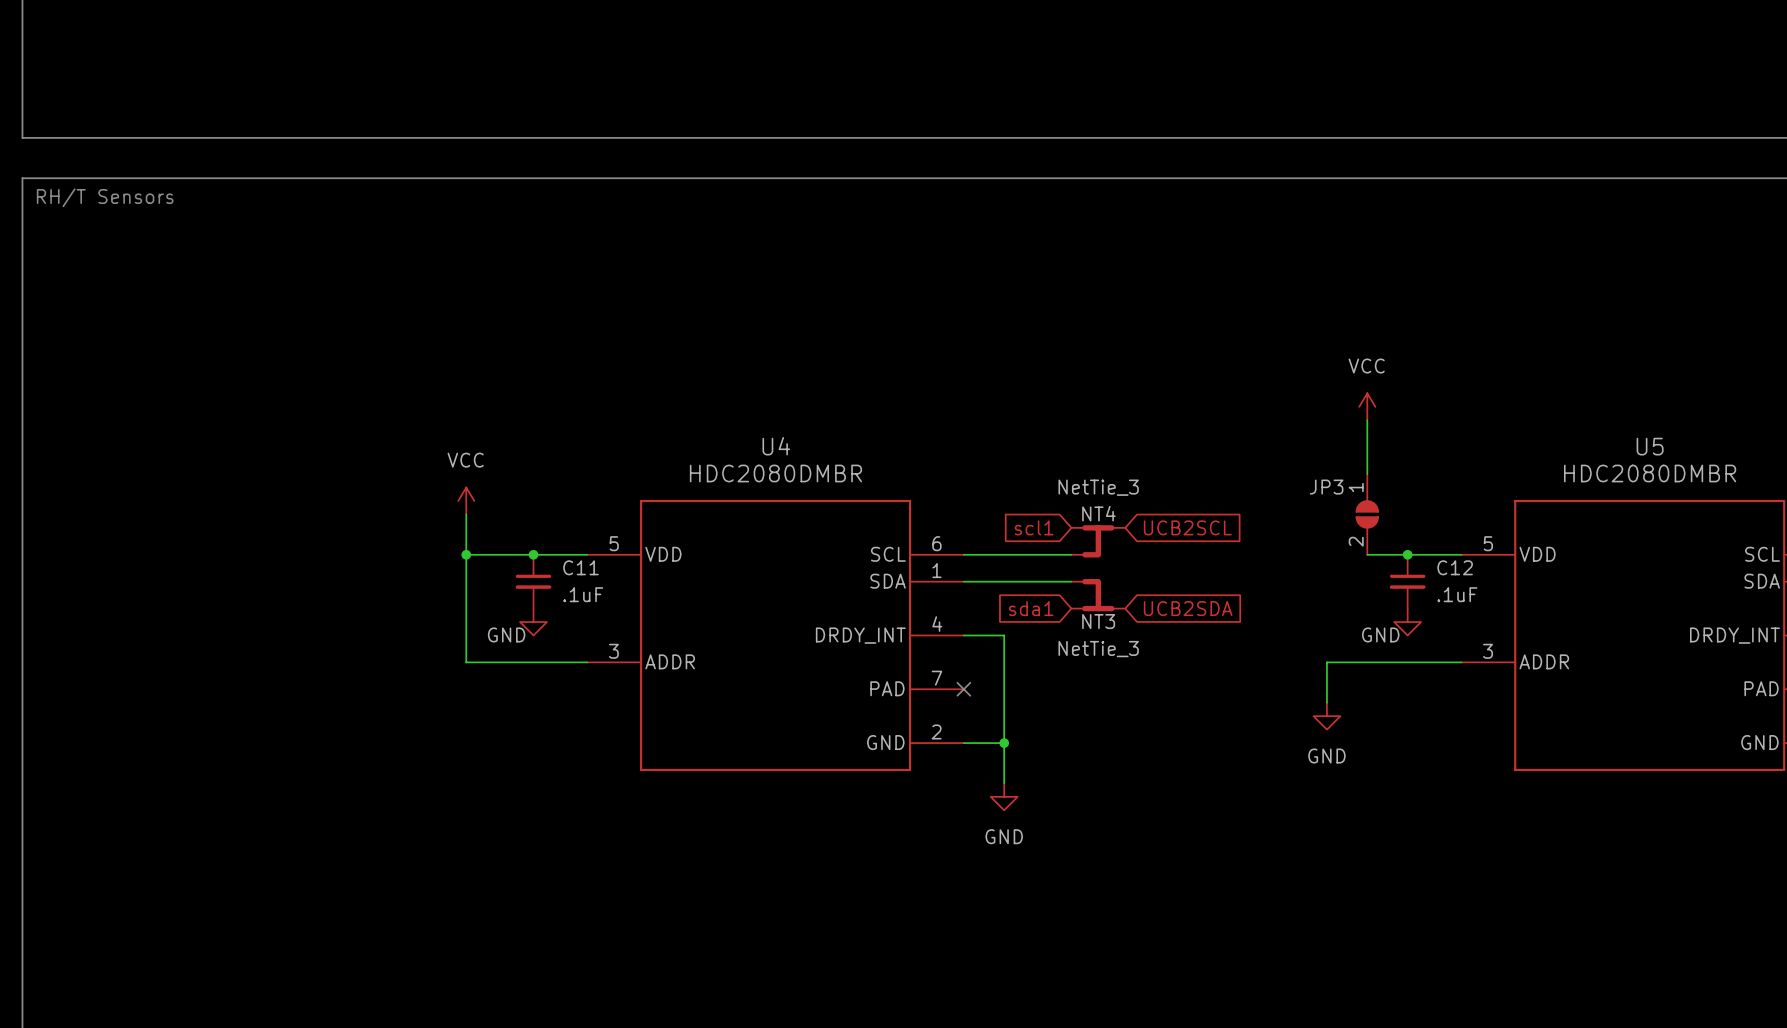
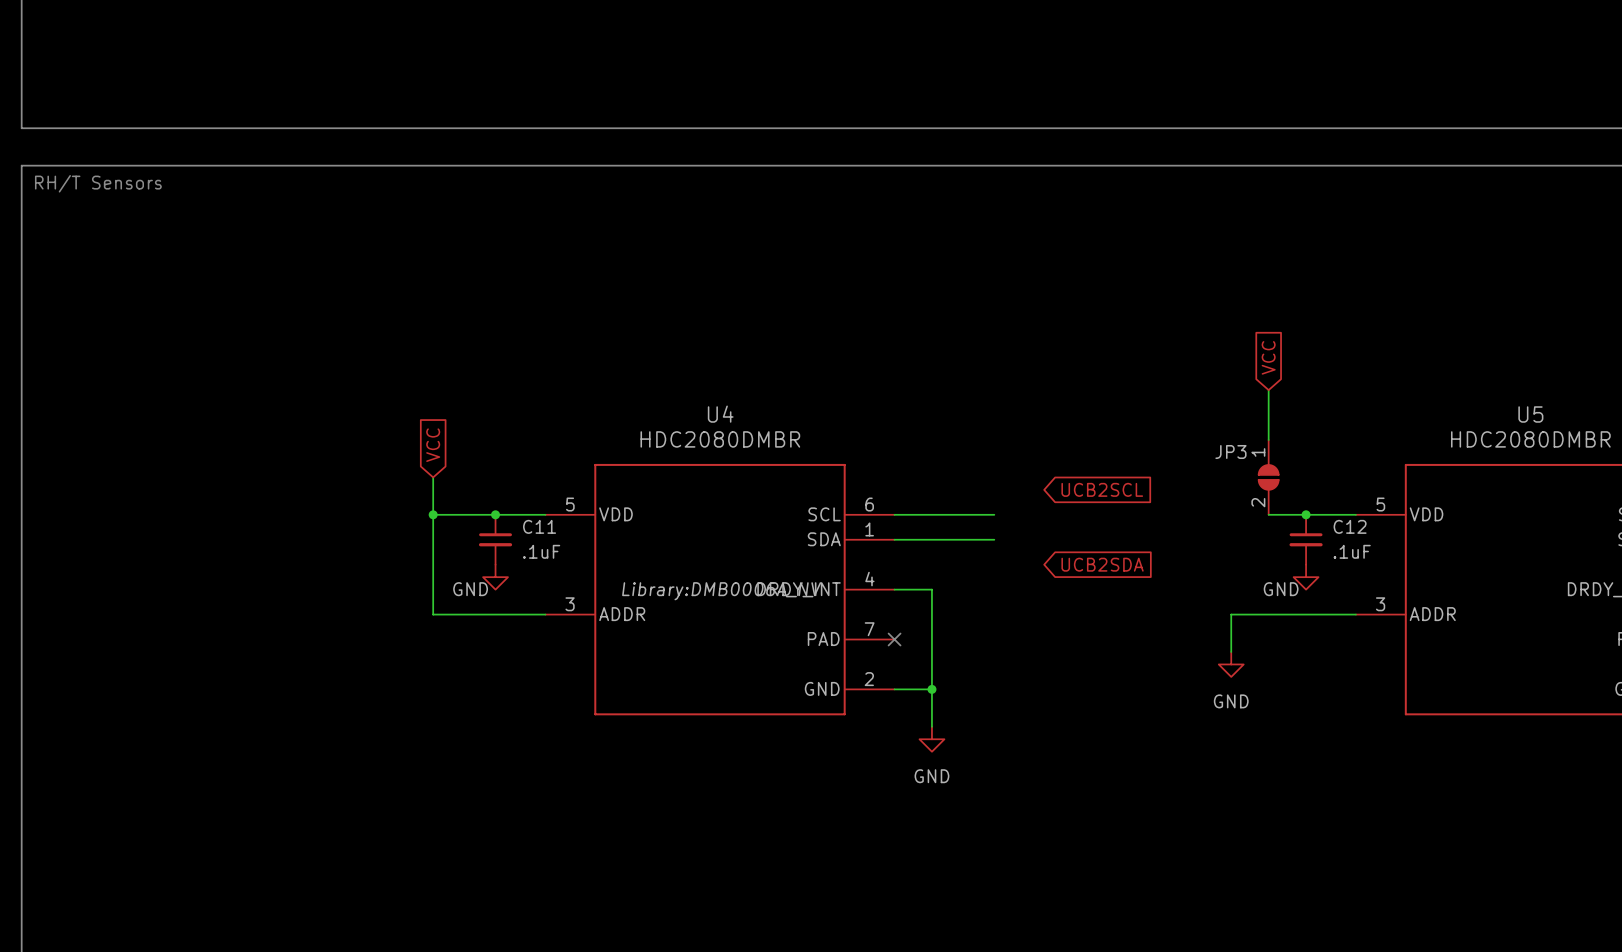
global label: none -> VCC (1268, 357)
power symbol: VCC (1367, 406) -> none
global label: none -> VCC (433, 445)
power symbol: VCC (466, 501) -> none
global label: scl1 (1034, 527) -> none
NT4: NetTie_3 (1098, 541) -> none
NT3: NetTie_3 (1098, 595) -> none
global label: sda1 (1031, 608) -> none
U4 text: none -> Library:DMB0006A_NV (721, 591)

